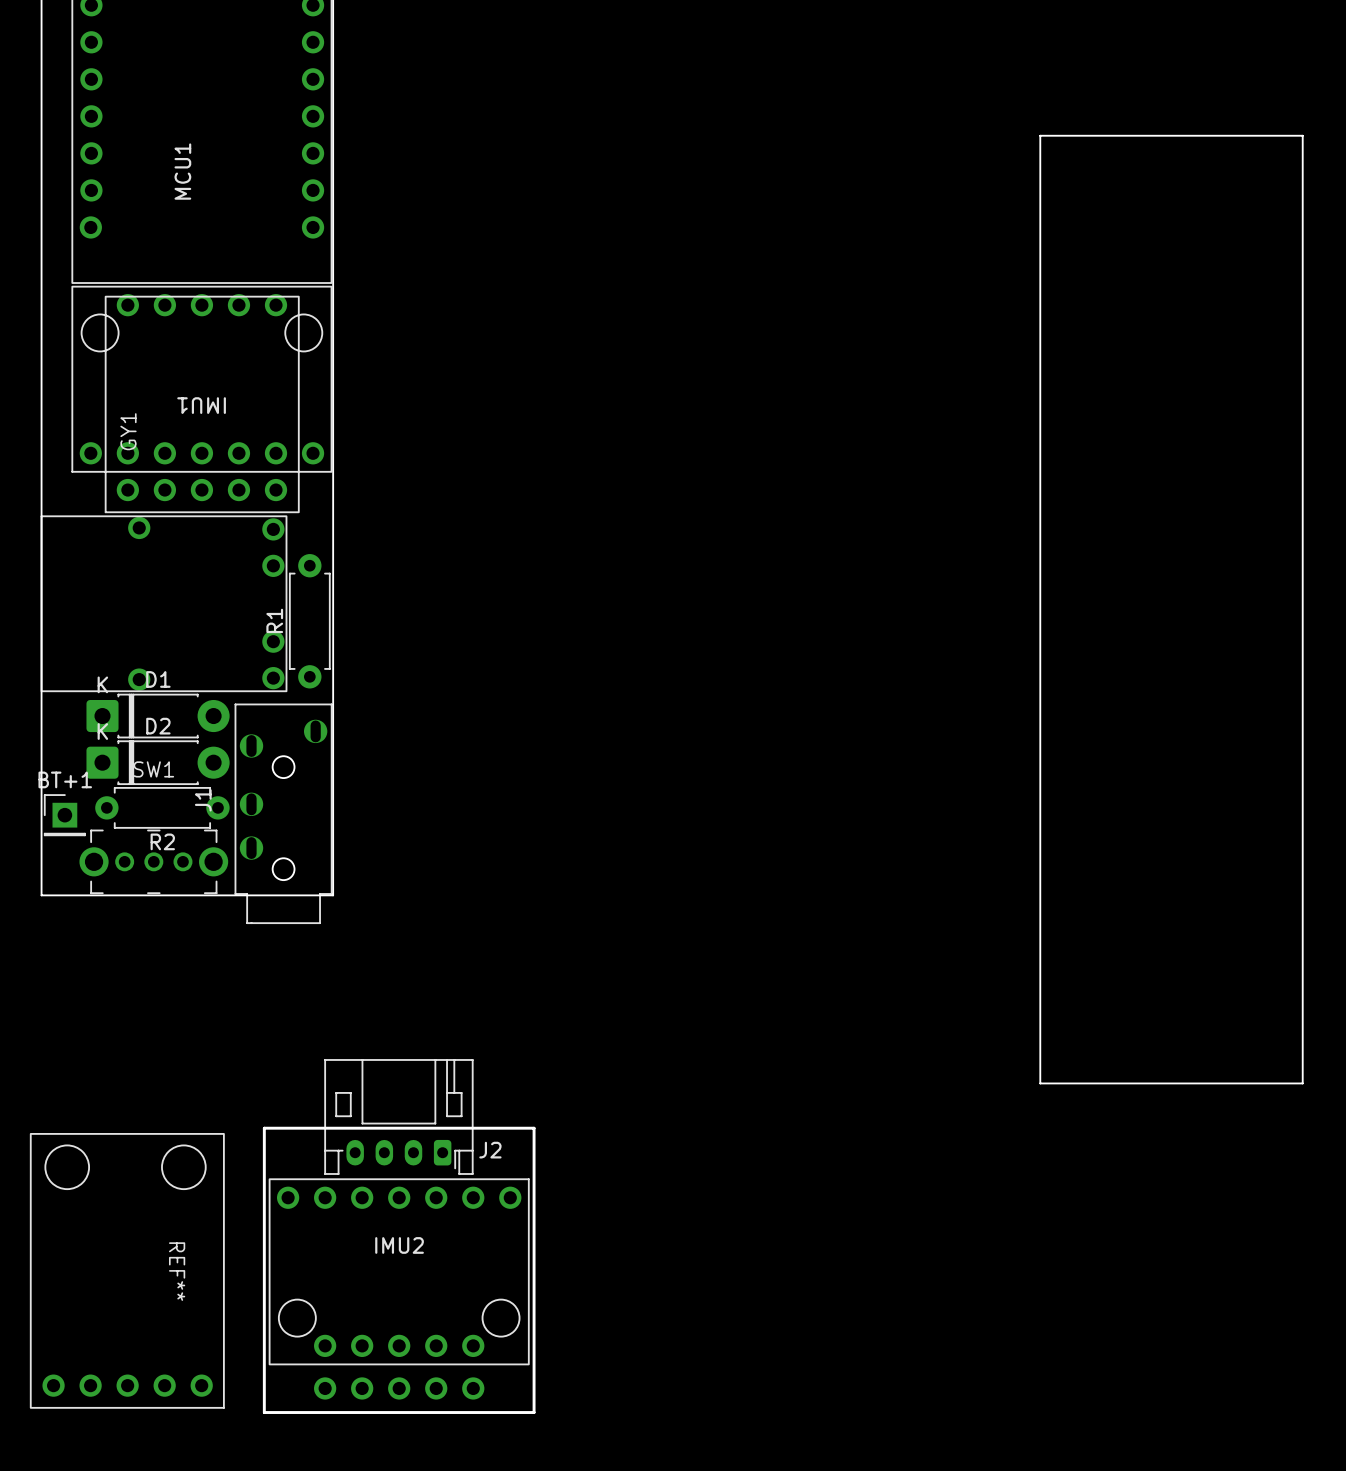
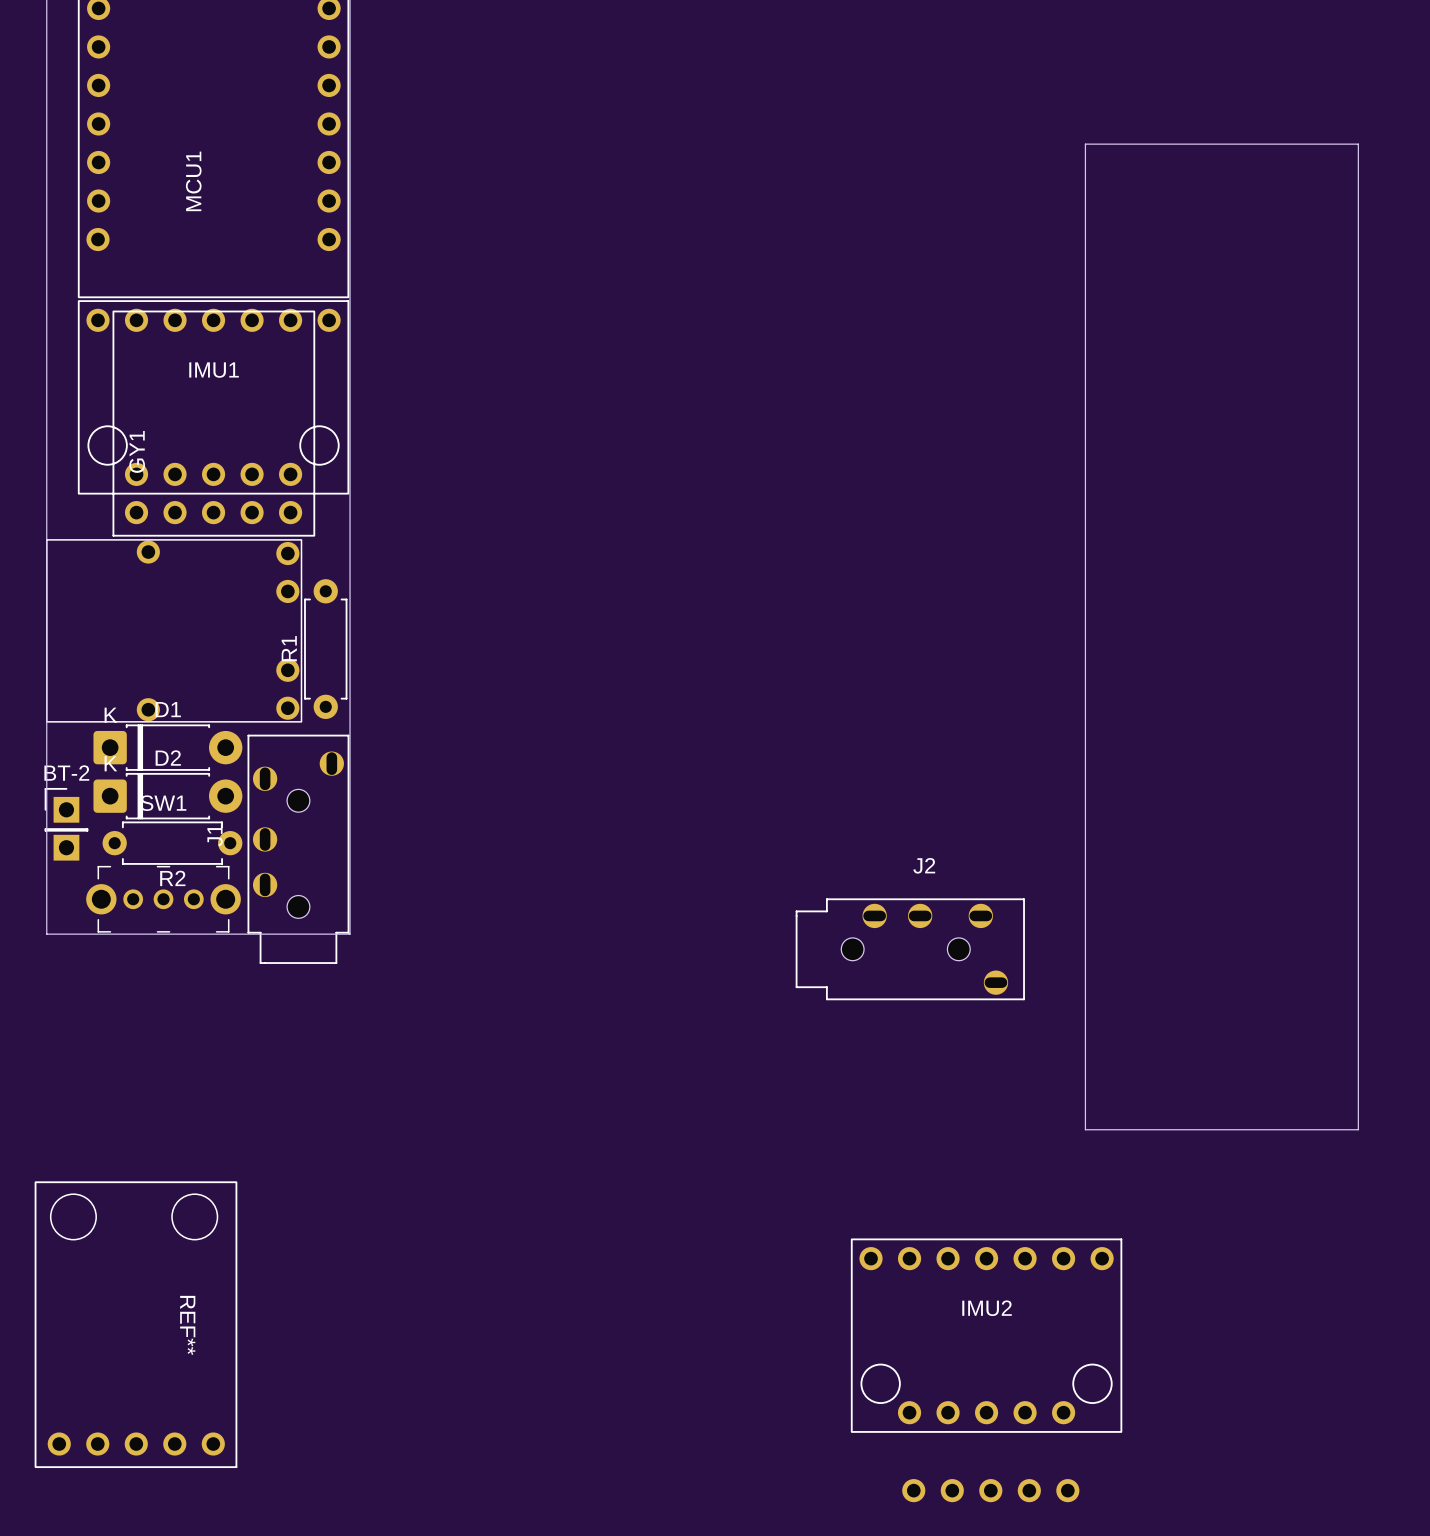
IMU1 rotation: 0° (201, 379) -> 180° (213, 397)
BT-2: none -> (66, 809)
part: none -> (66, 847)
BT+1: (64, 815) -> none
J2 footprint: [324, 1059, 474, 1175] -> [795, 898, 1025, 1001]
board edge: (264, 1128) (534, 1128) (534, 1412) (264, 1412) (264, 1128) -> none
J2 name position: J2 (490, 1150) -> J2 (924, 865)
IMU2 position: (399, 1271) -> (986, 1335)
part: (399, 1388) -> none
part: none -> (990, 1490)

